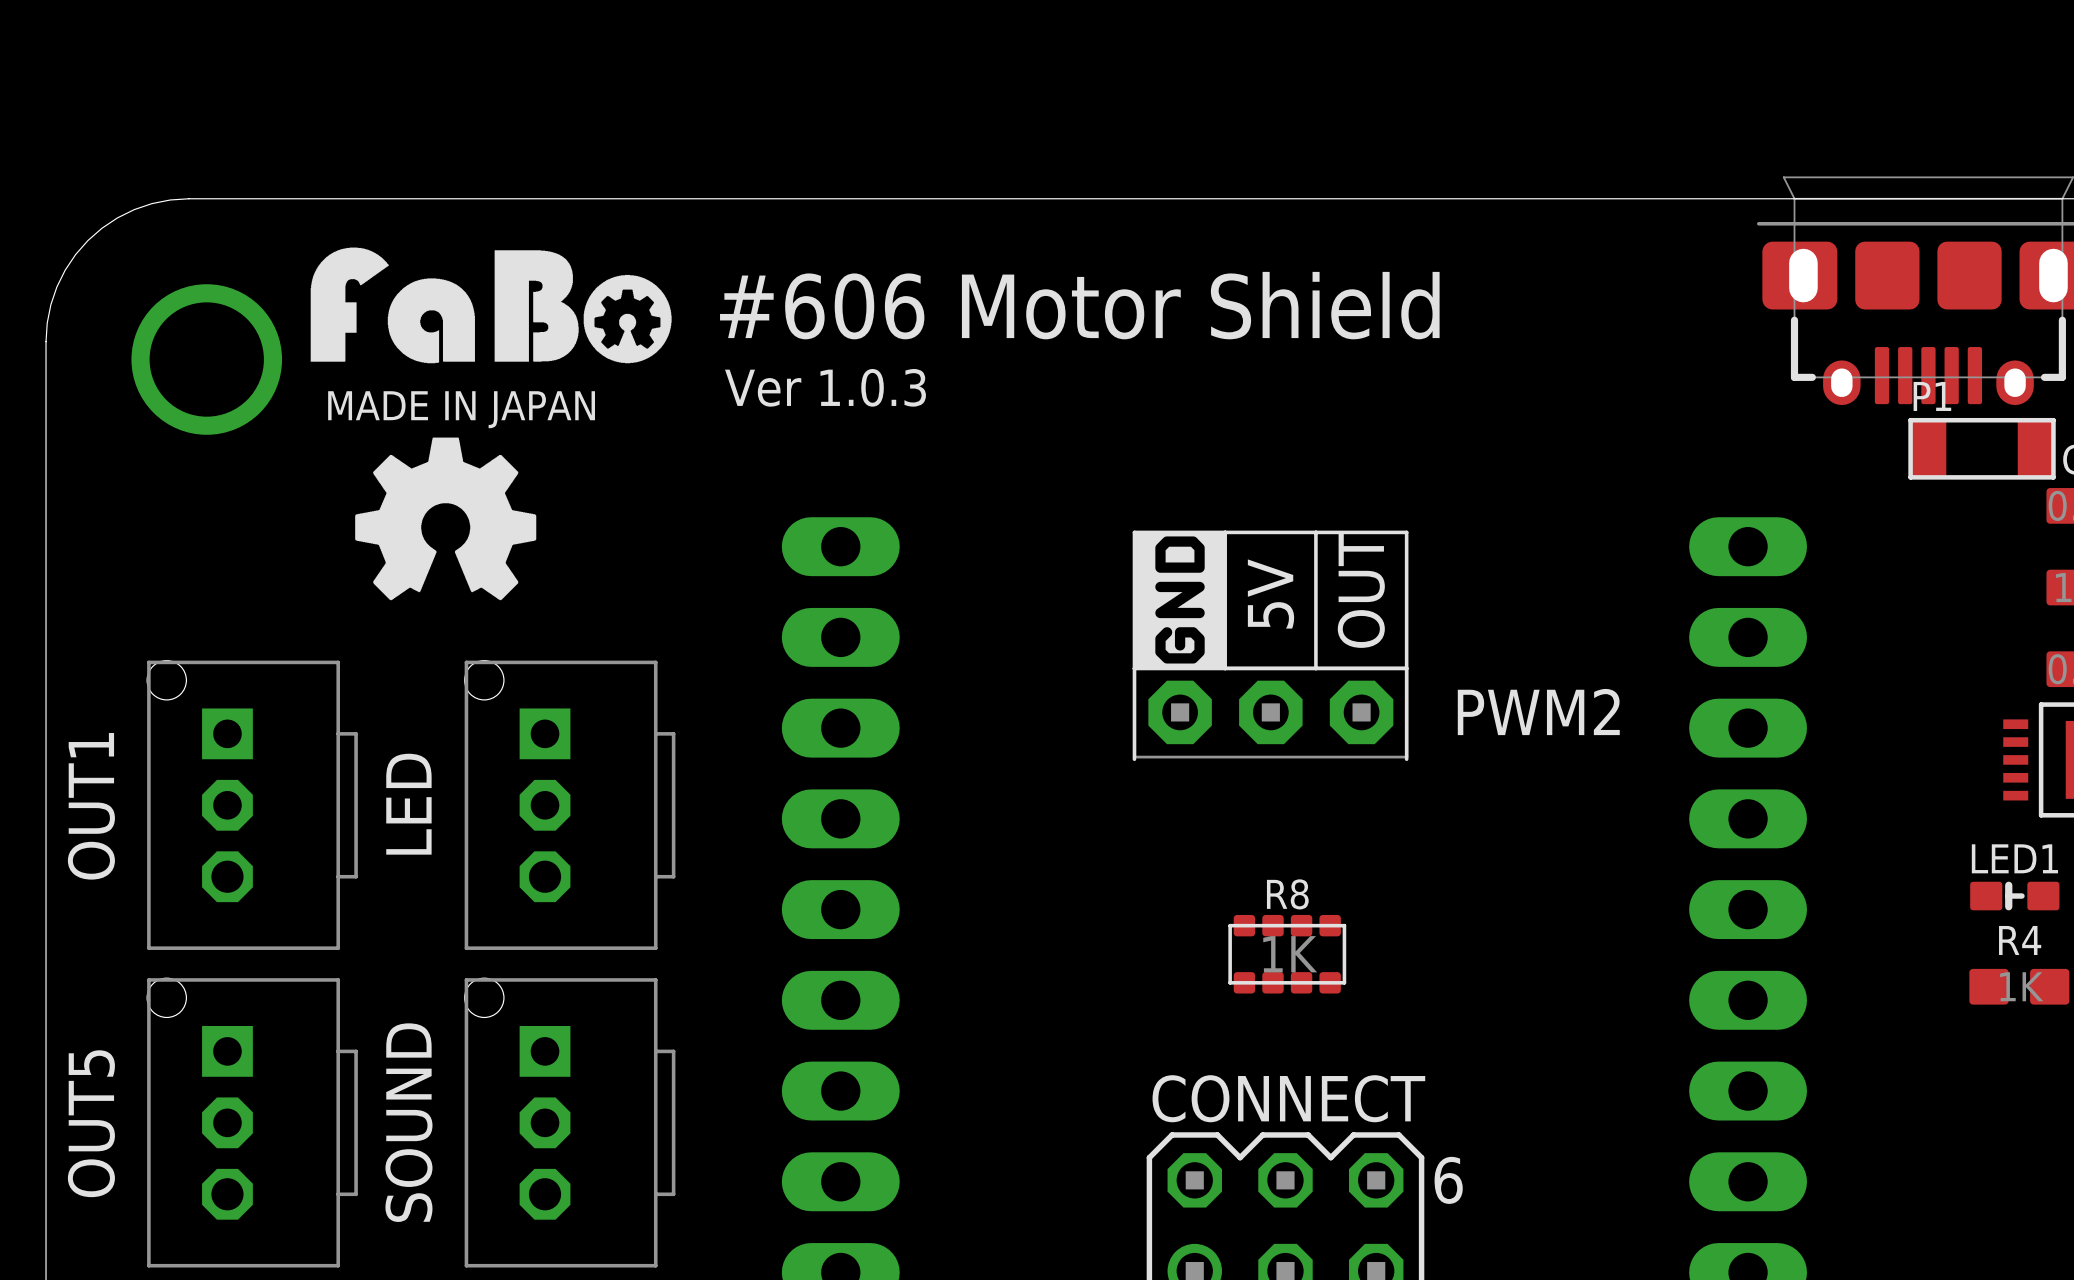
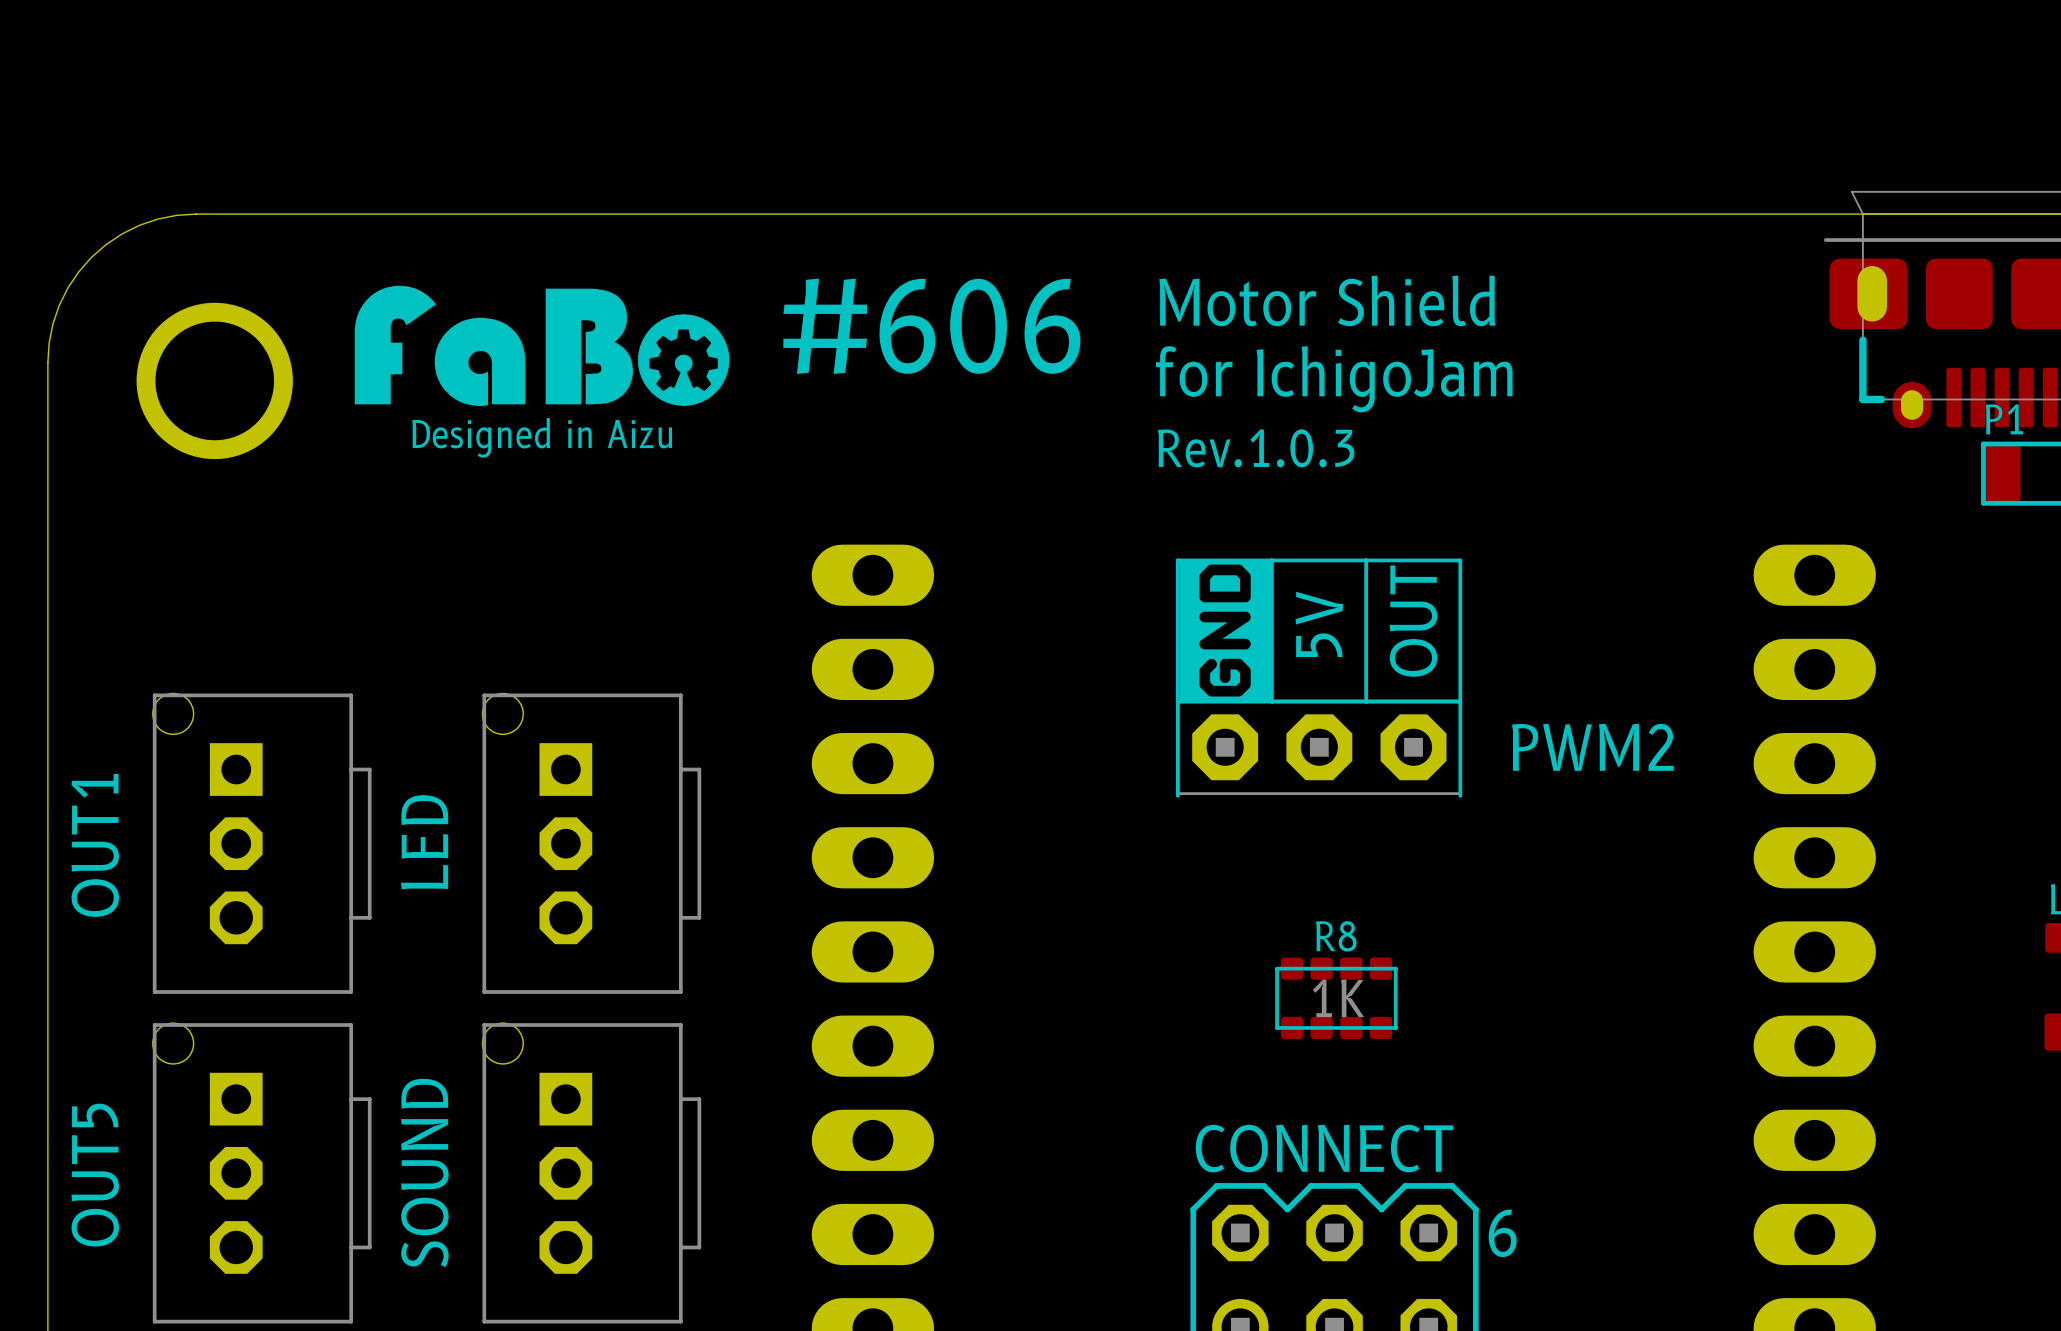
drawing position: (491, 305) -> (542, 345)
text: #606 Motor Shield (1079, 305) -> Motor Shield (1327, 300)
text: none -> #606 (931, 326)
text: none -> for IchigoJam (1334, 379)
text: Ver 1.0.3 (825, 387) -> none
text: MADE IN JAPAN (461, 409) -> none
text: none -> Designed in Aizu (542, 437)
text: none -> Rev.1.0.3 (1256, 448)
drawing: [355, 437, 537, 601] -> none

